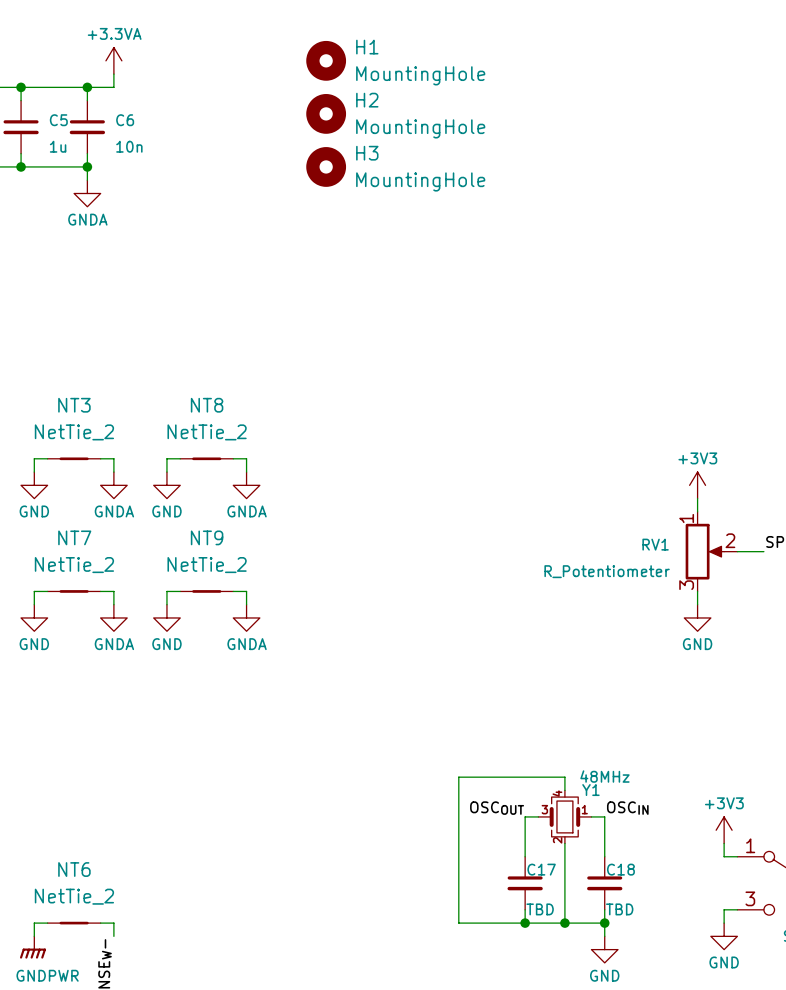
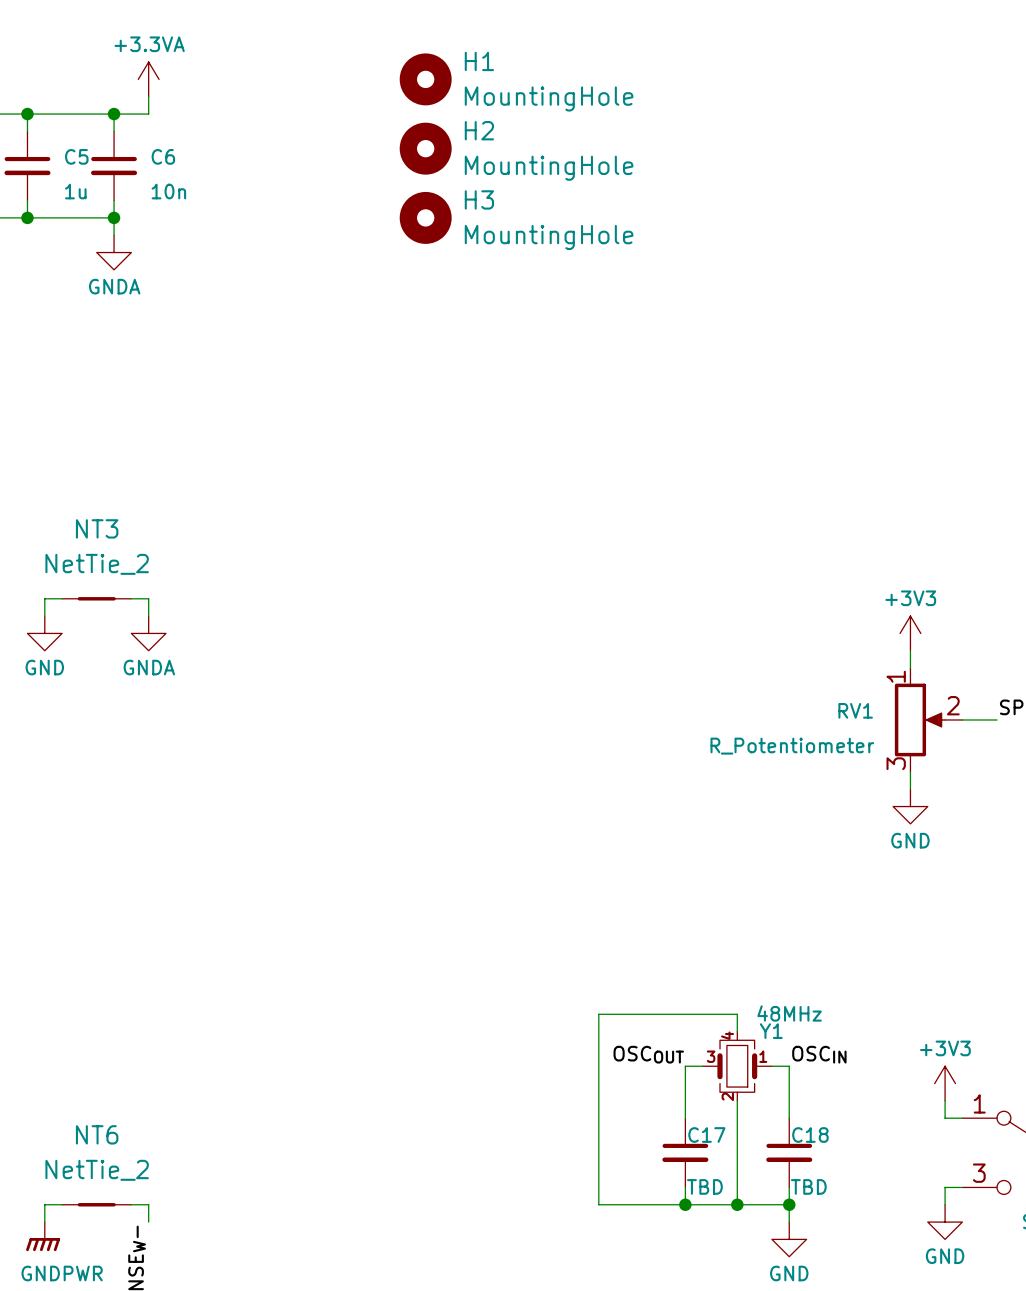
wire: (180, 458) (166, 458) (166, 472) -> none
NT8: NetTie_2 (206, 458) -> none
wire: (233, 458) (246, 458) (246, 472) -> none
power symbol: GND (166, 485) -> none
power symbol: GNDA (246, 485) -> none
wire: (47, 591) (34, 591) (34, 604) -> none
NT7: NetTie_2 (74, 591) -> none
wire: (100, 591) (113, 591) (113, 604) -> none
wire: (180, 591) (166, 591) (166, 604) -> none
NT9: NetTie_2 (206, 591) -> none
wire: (233, 591) (246, 591) (246, 604) -> none
power symbol: GND (34, 617) -> none
power symbol: GNDA (113, 617) -> none
power symbol: GND (166, 617) -> none
power symbol: GNDA (246, 617) -> none

